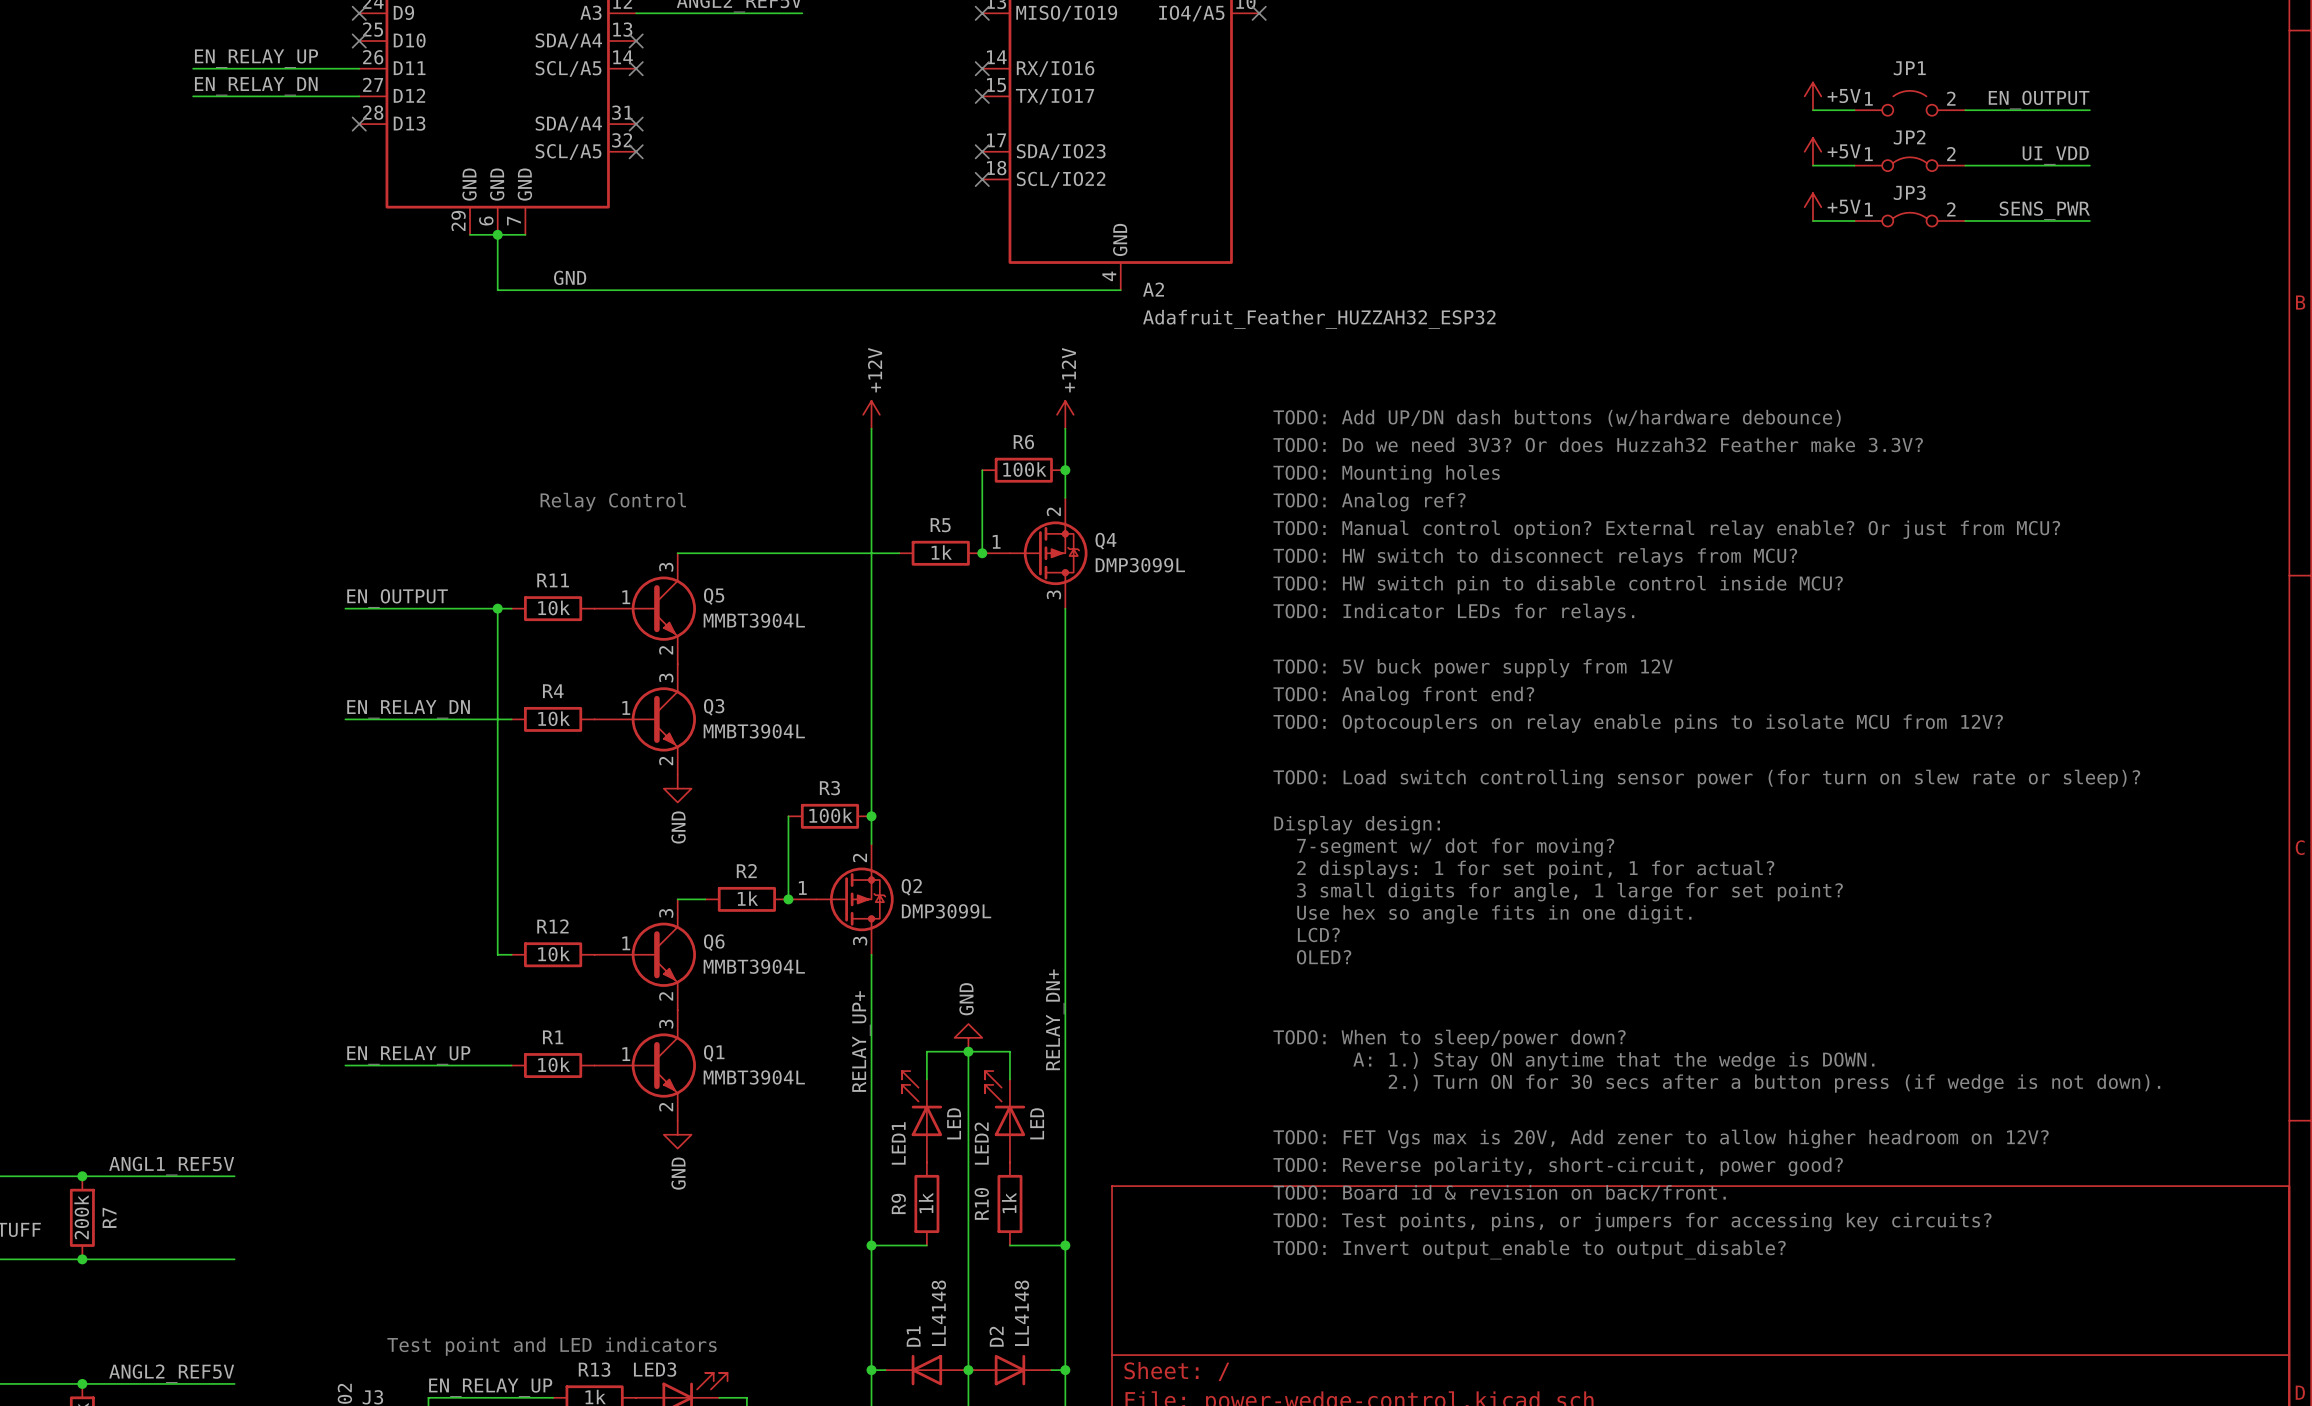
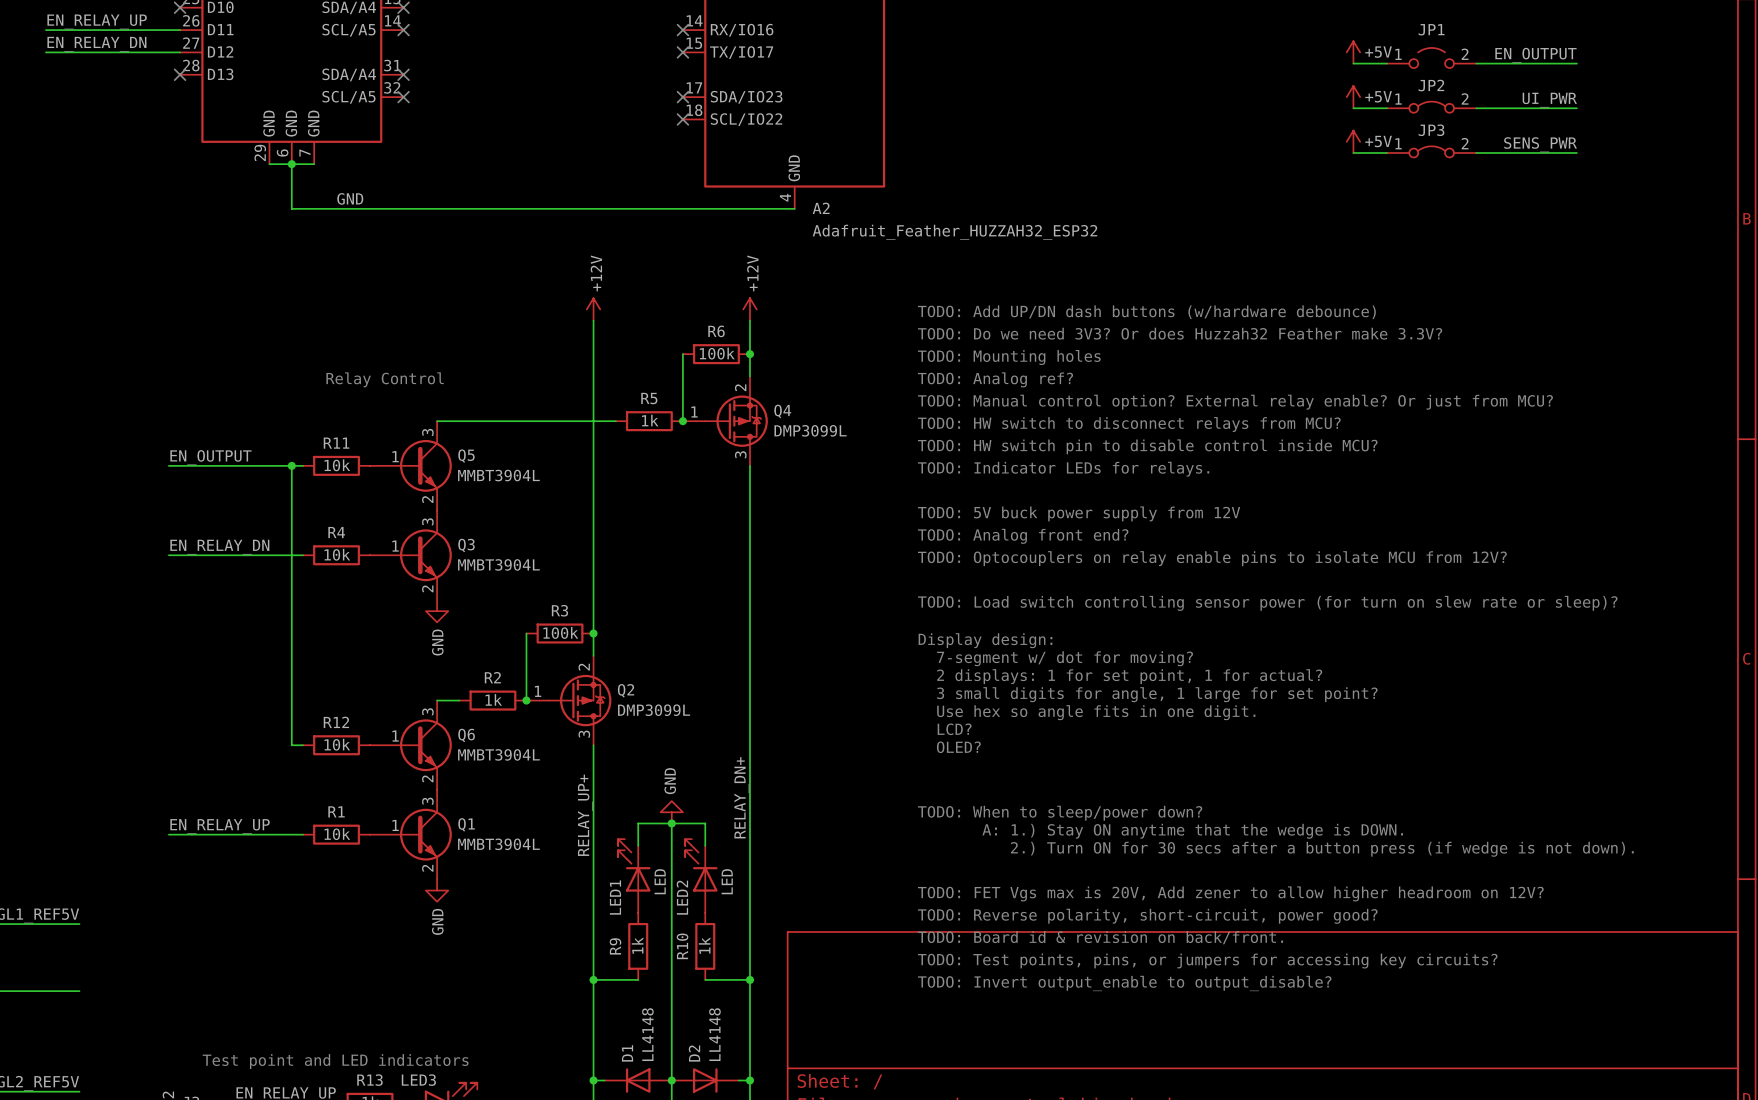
label: UI_VDD (2055, 155) -> UI_PWR (1549, 100)

